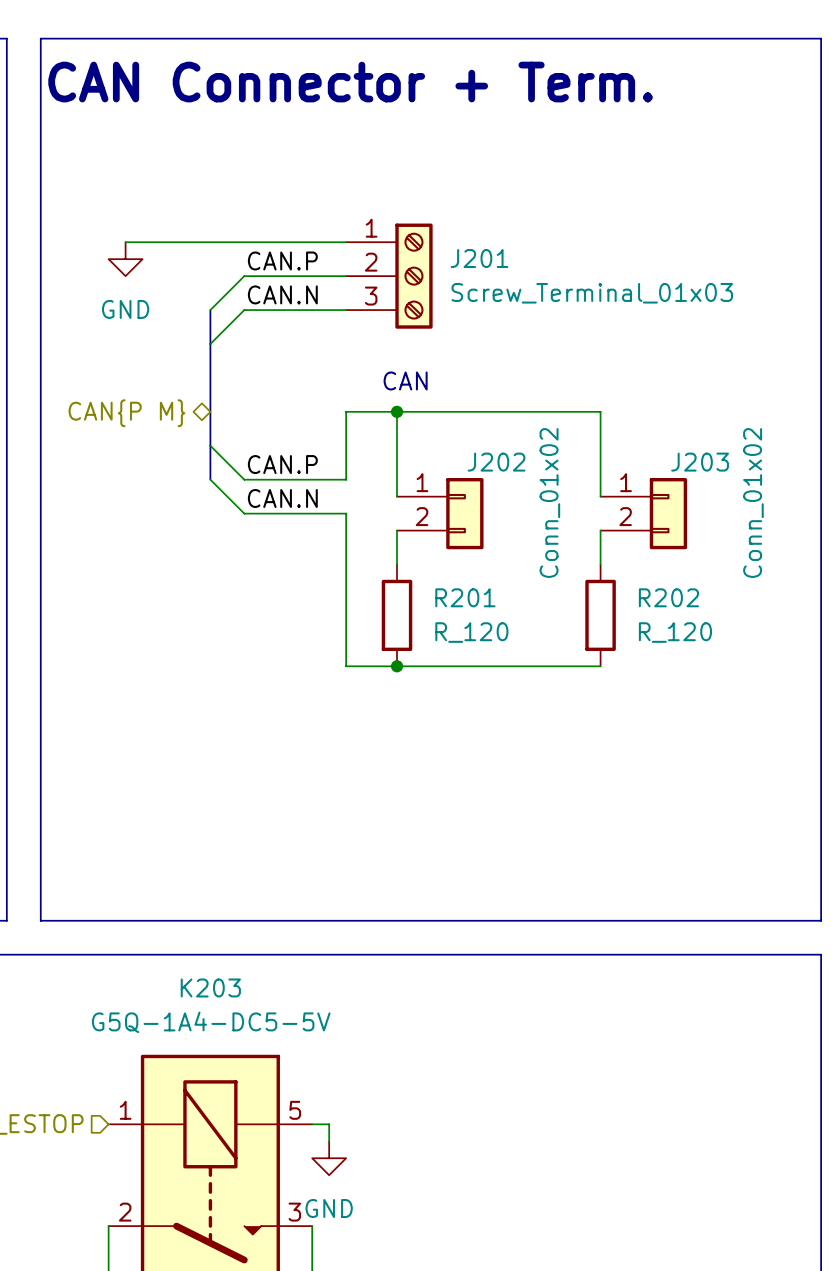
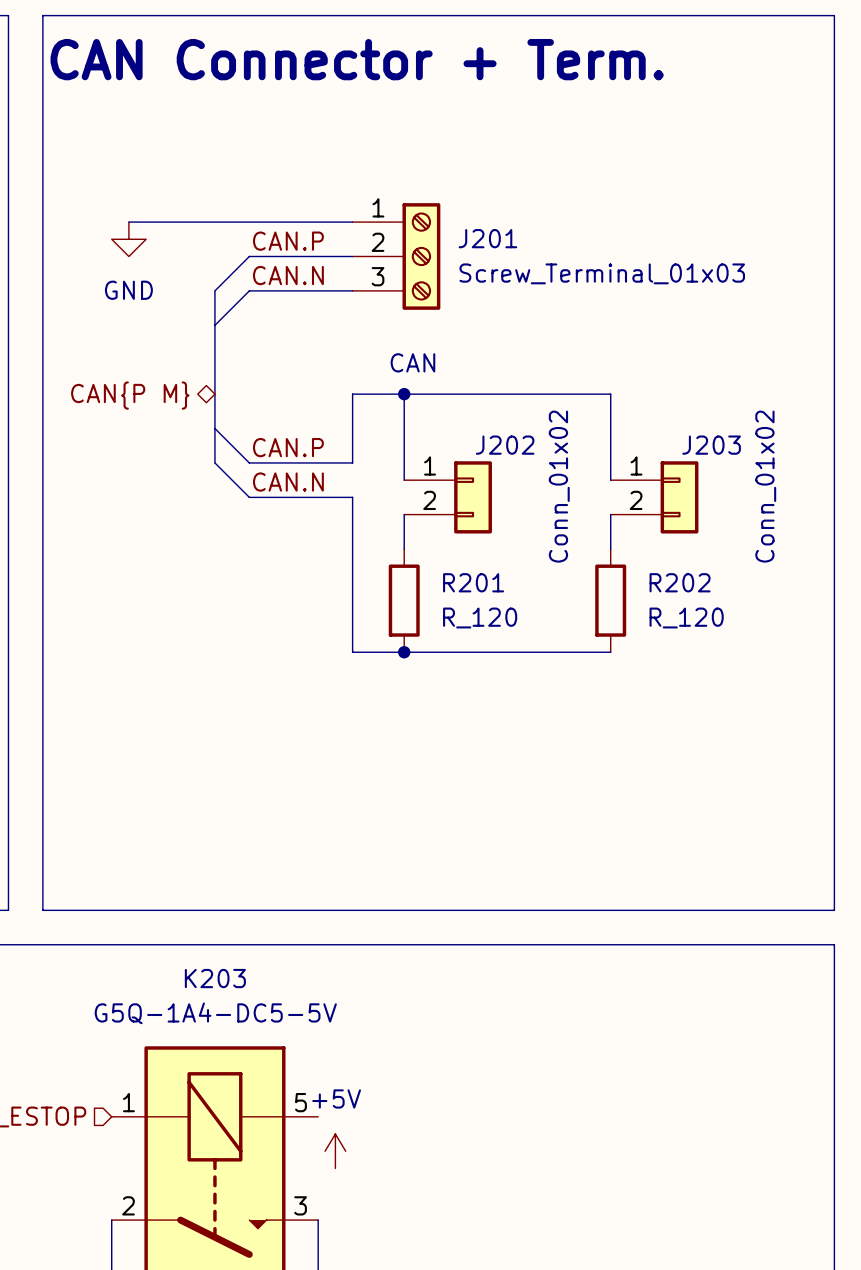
wire: (312, 1124) (329, 1124) (329, 1141) -> none
power symbol: GND (329, 1158) -> +5V (335, 1151)

